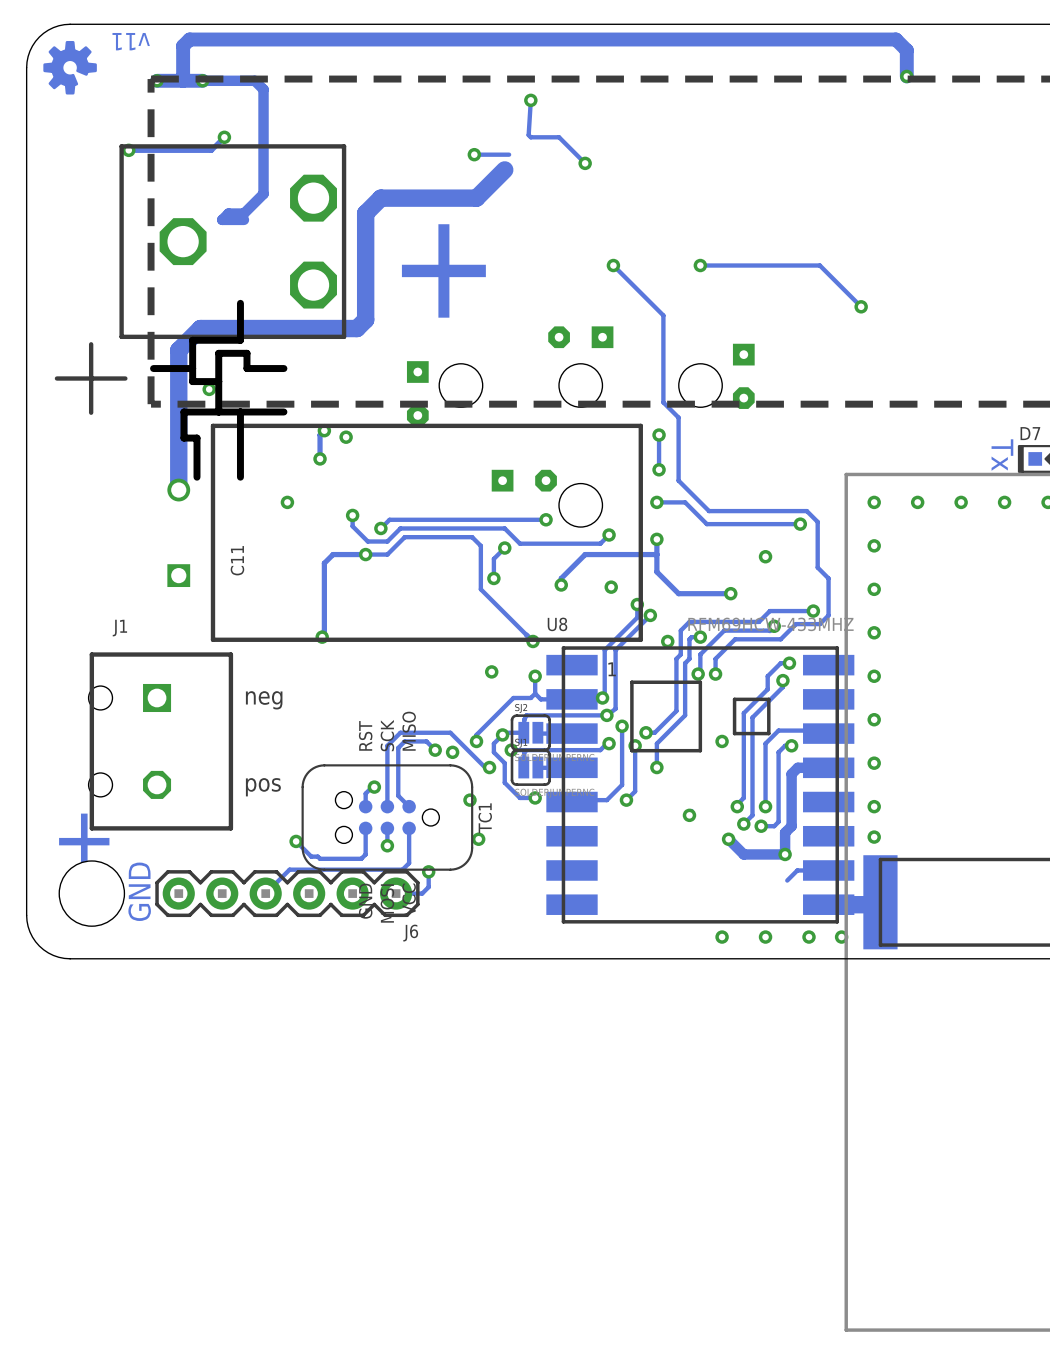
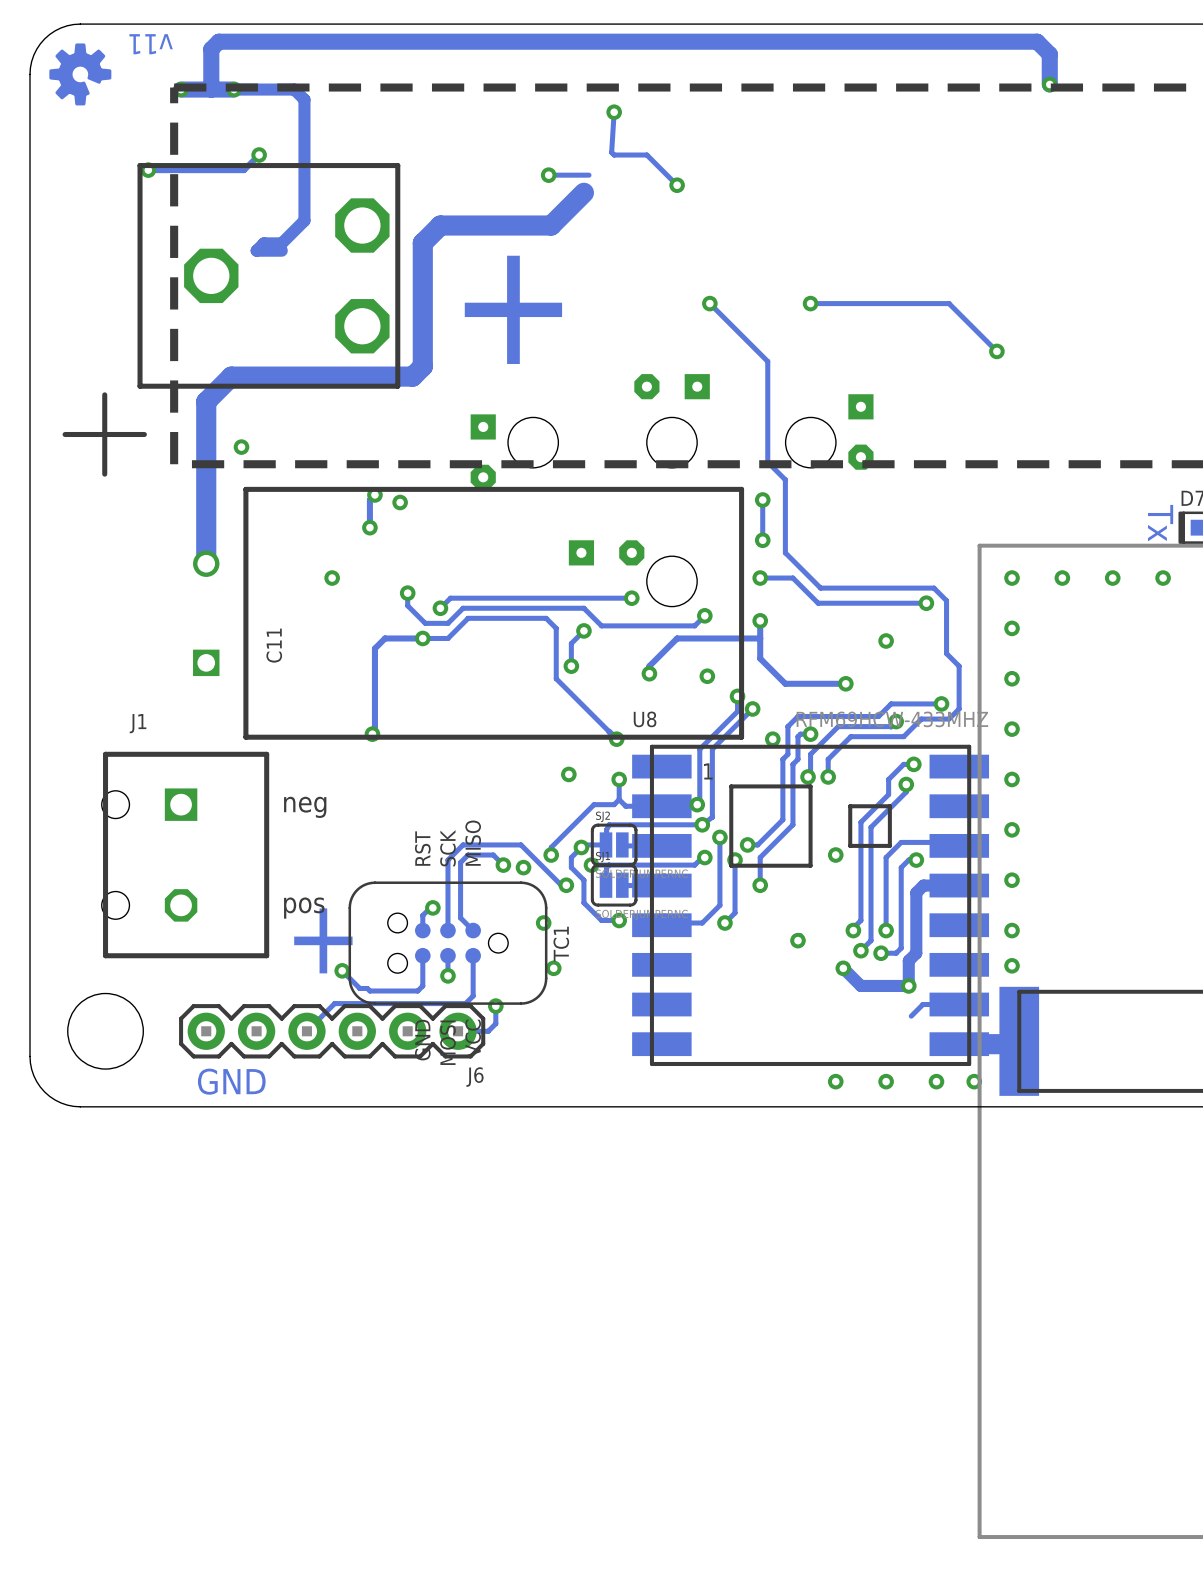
board edge: (240, 303) (240, 340) (192, 340) (192, 381) (218, 381) -> none
board edge: (192, 368) (153, 368) -> none
board edge: (283, 368) (246, 368) (246, 353) (218, 353) (218, 411) -> none
board edge: (240, 411) (240, 477) -> none
board edge: (283, 411) (183, 411) (183, 438) (196, 438) (196, 477) -> none
text position: + (84, 841) -> + (323, 940)
text rotation: 0° (139, 891) -> 90° clockwise (231, 1081)
text position: GND (139, 891) -> GND (231, 1081)

